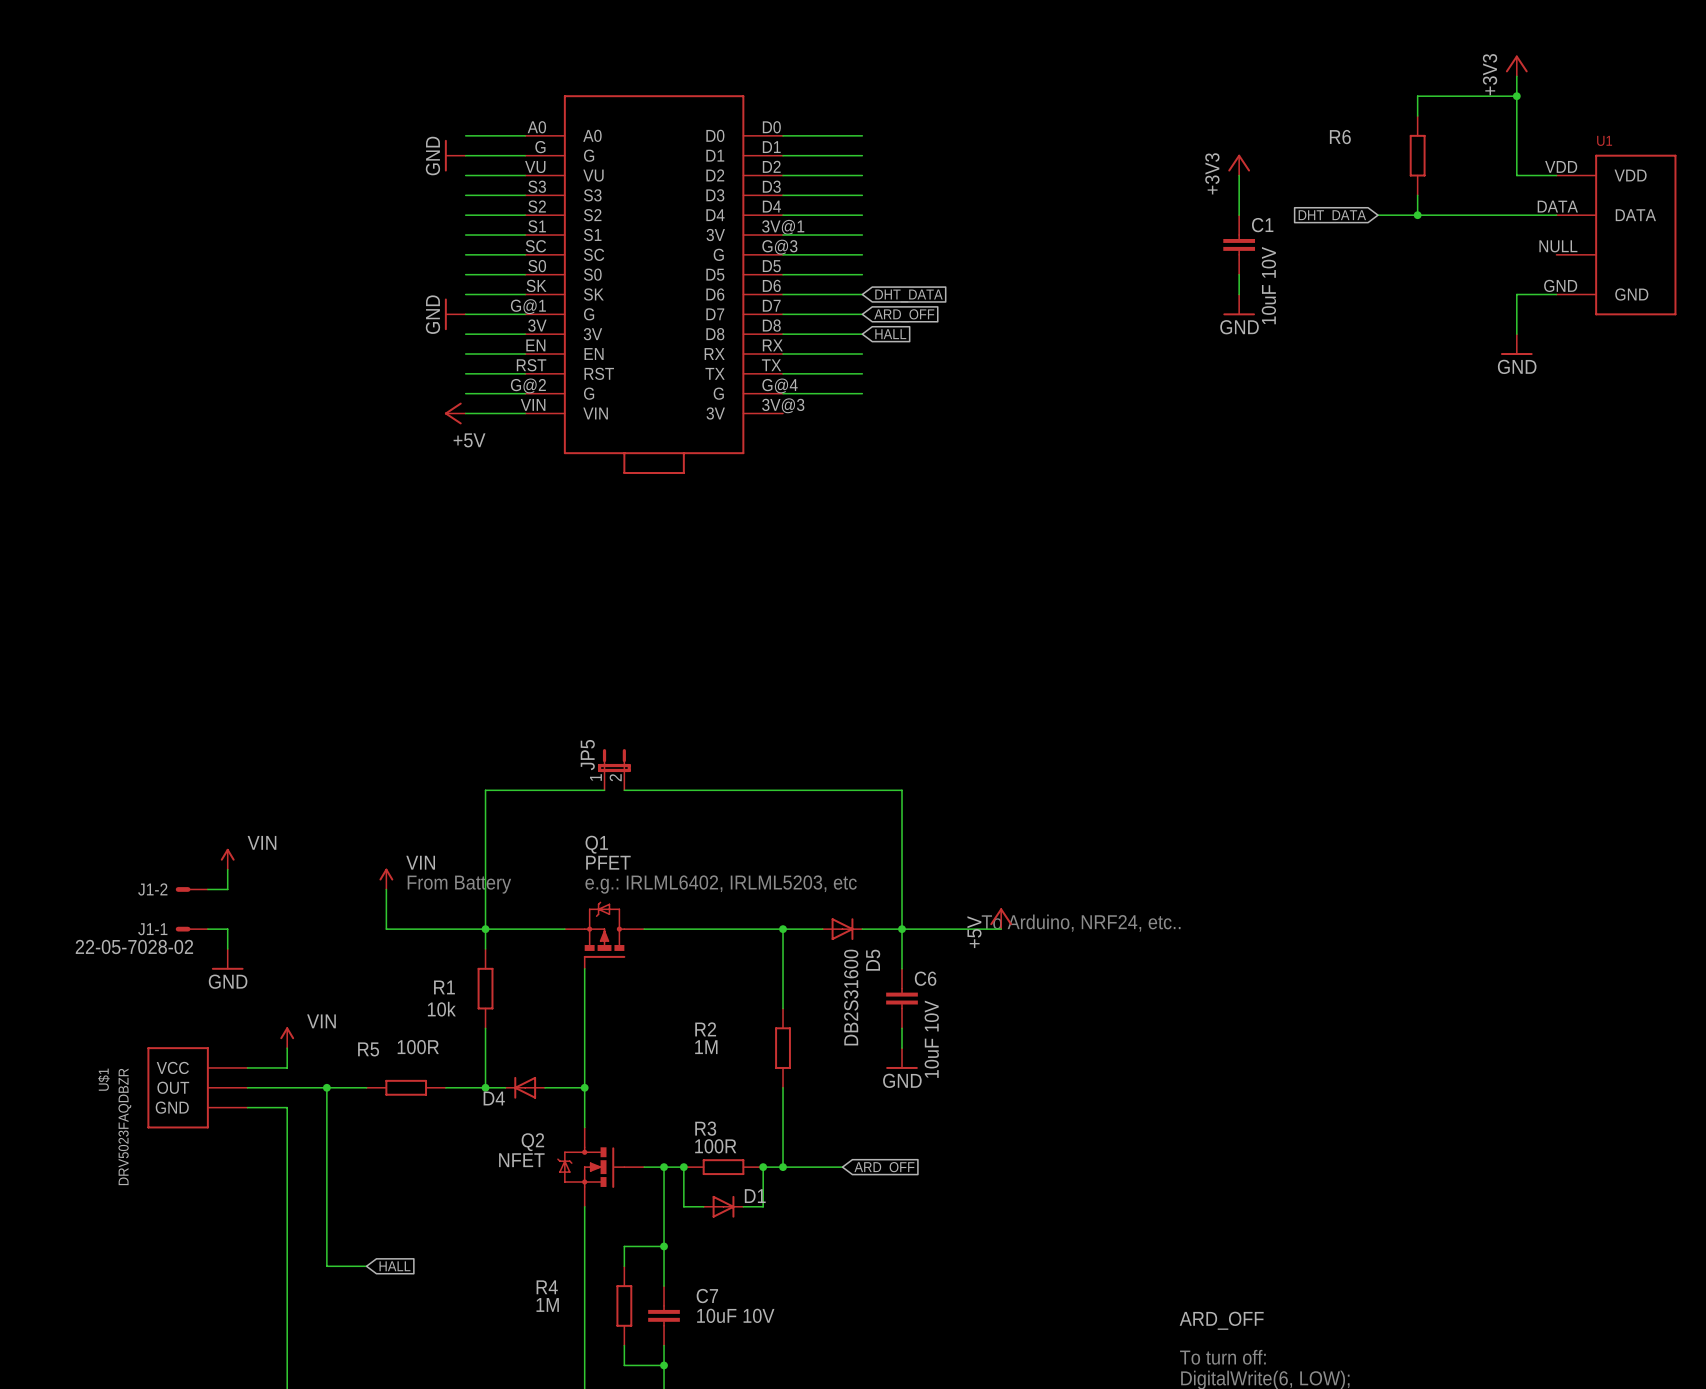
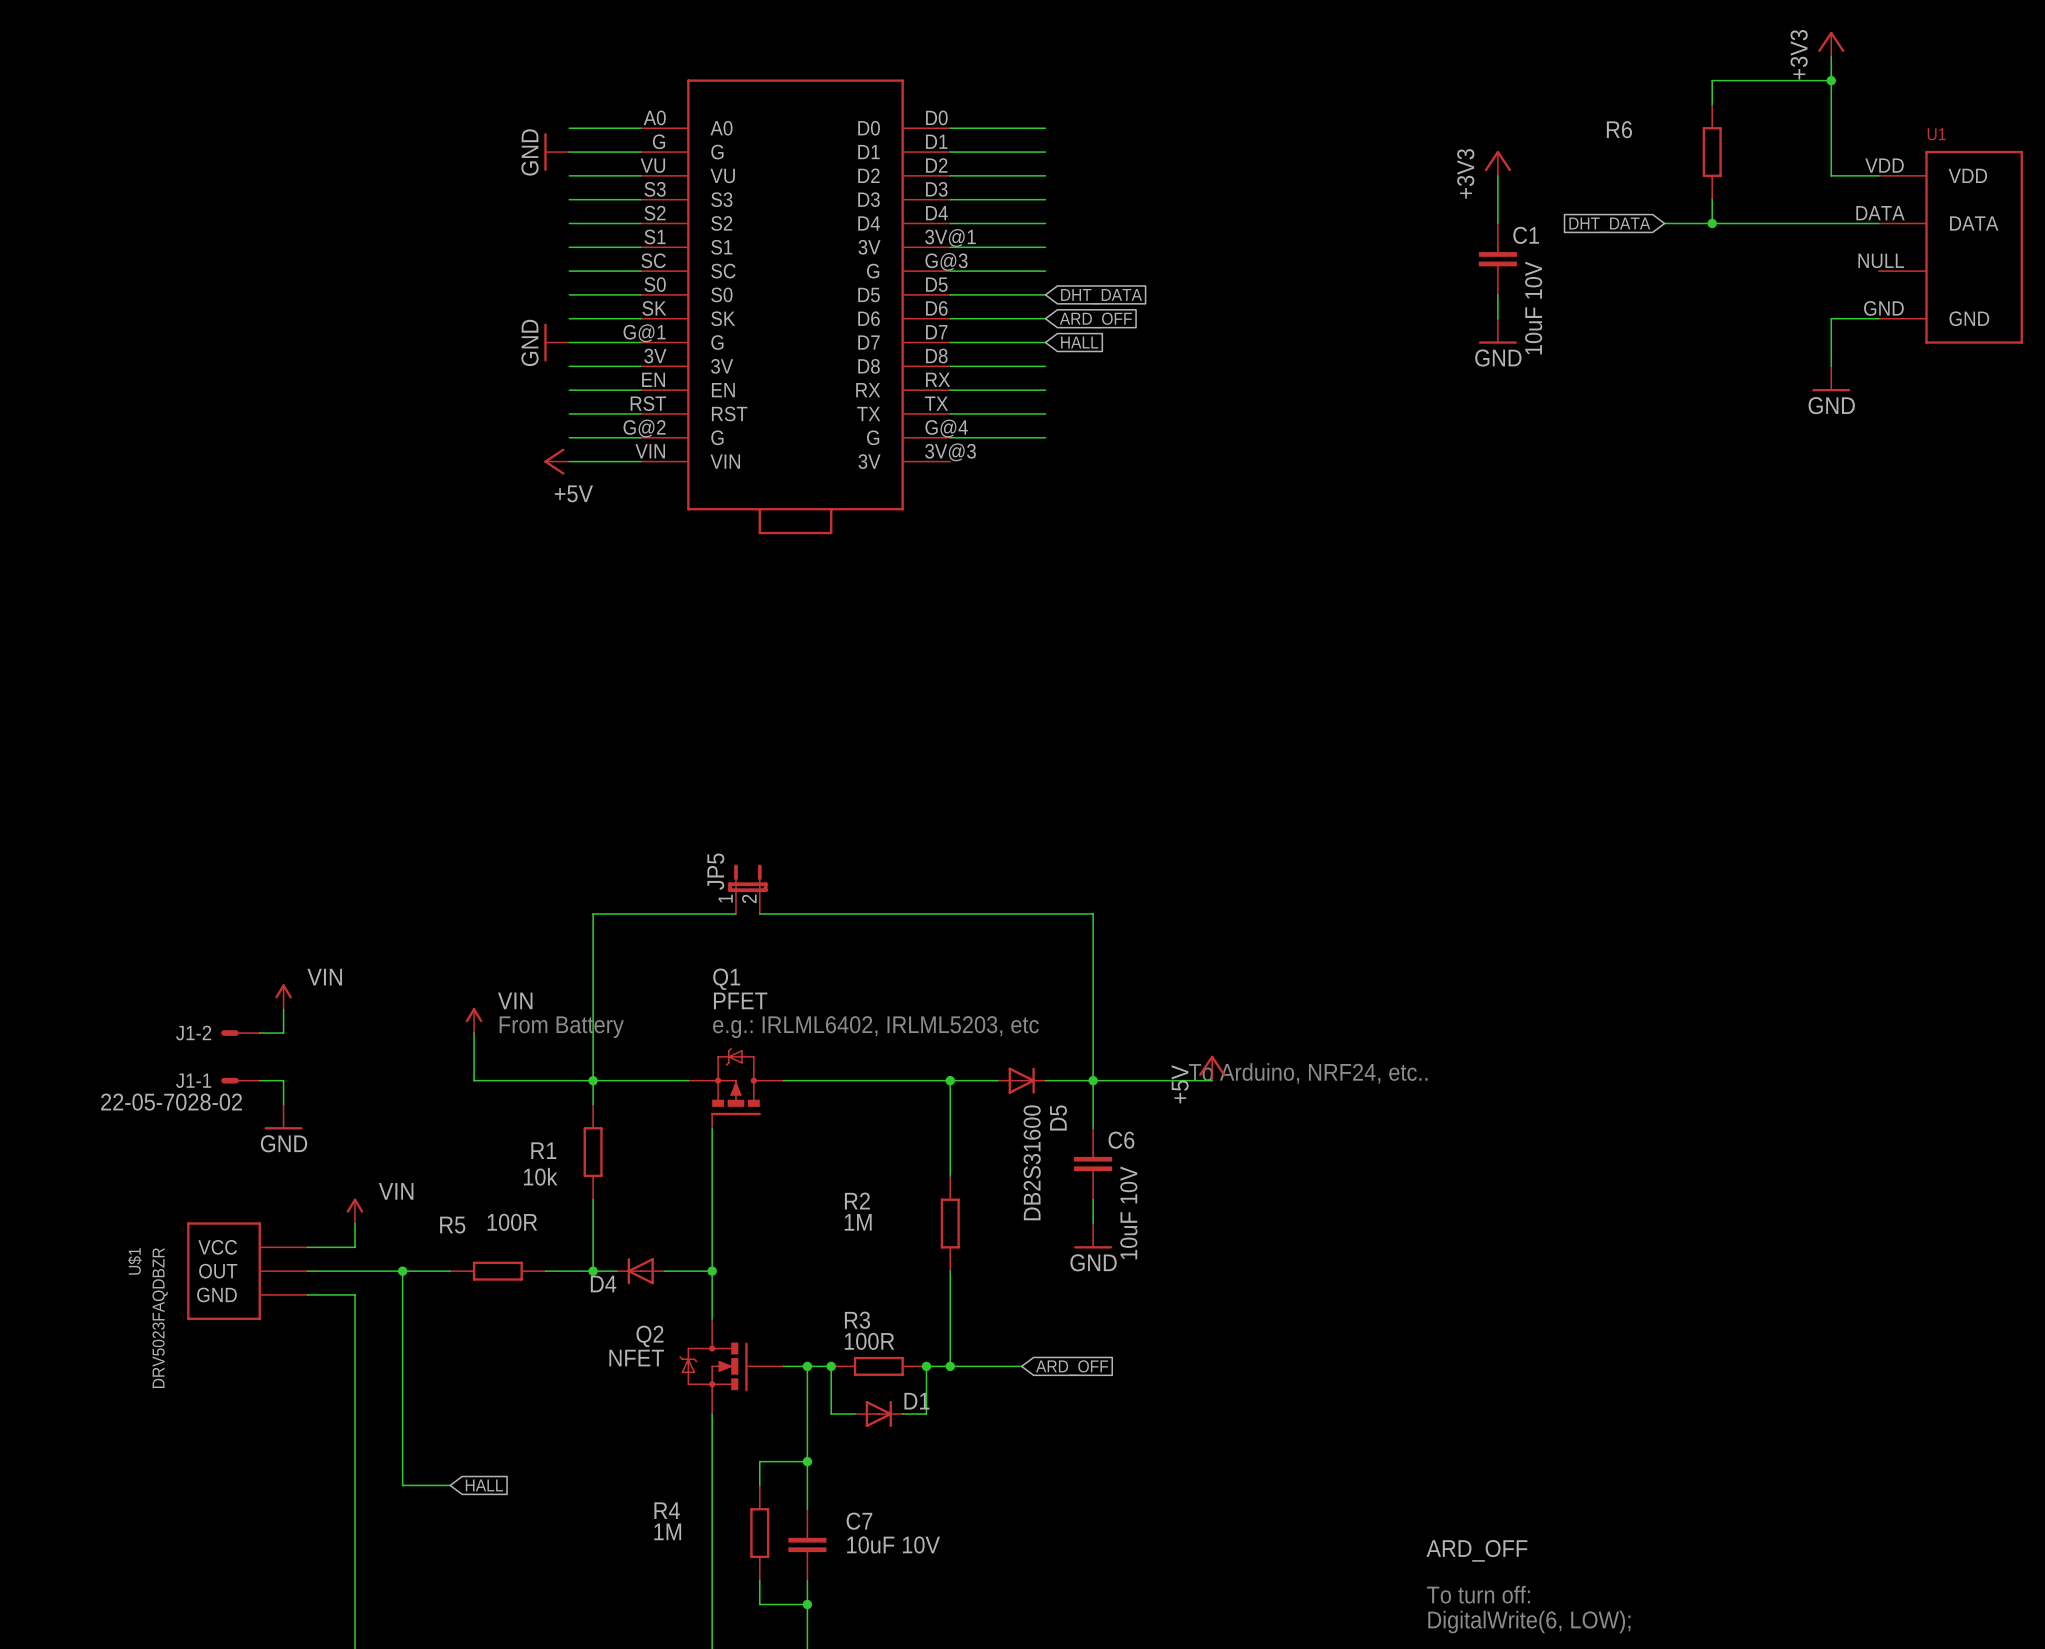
global label: none -> DHT_DATA (1101, 296)
global label: DHT_DATA (908, 295) -> ARD_OFF (1095, 320)
global label: ARD_OFF (904, 315) -> HALL (1079, 342)
global label: HALL (890, 334) -> none

